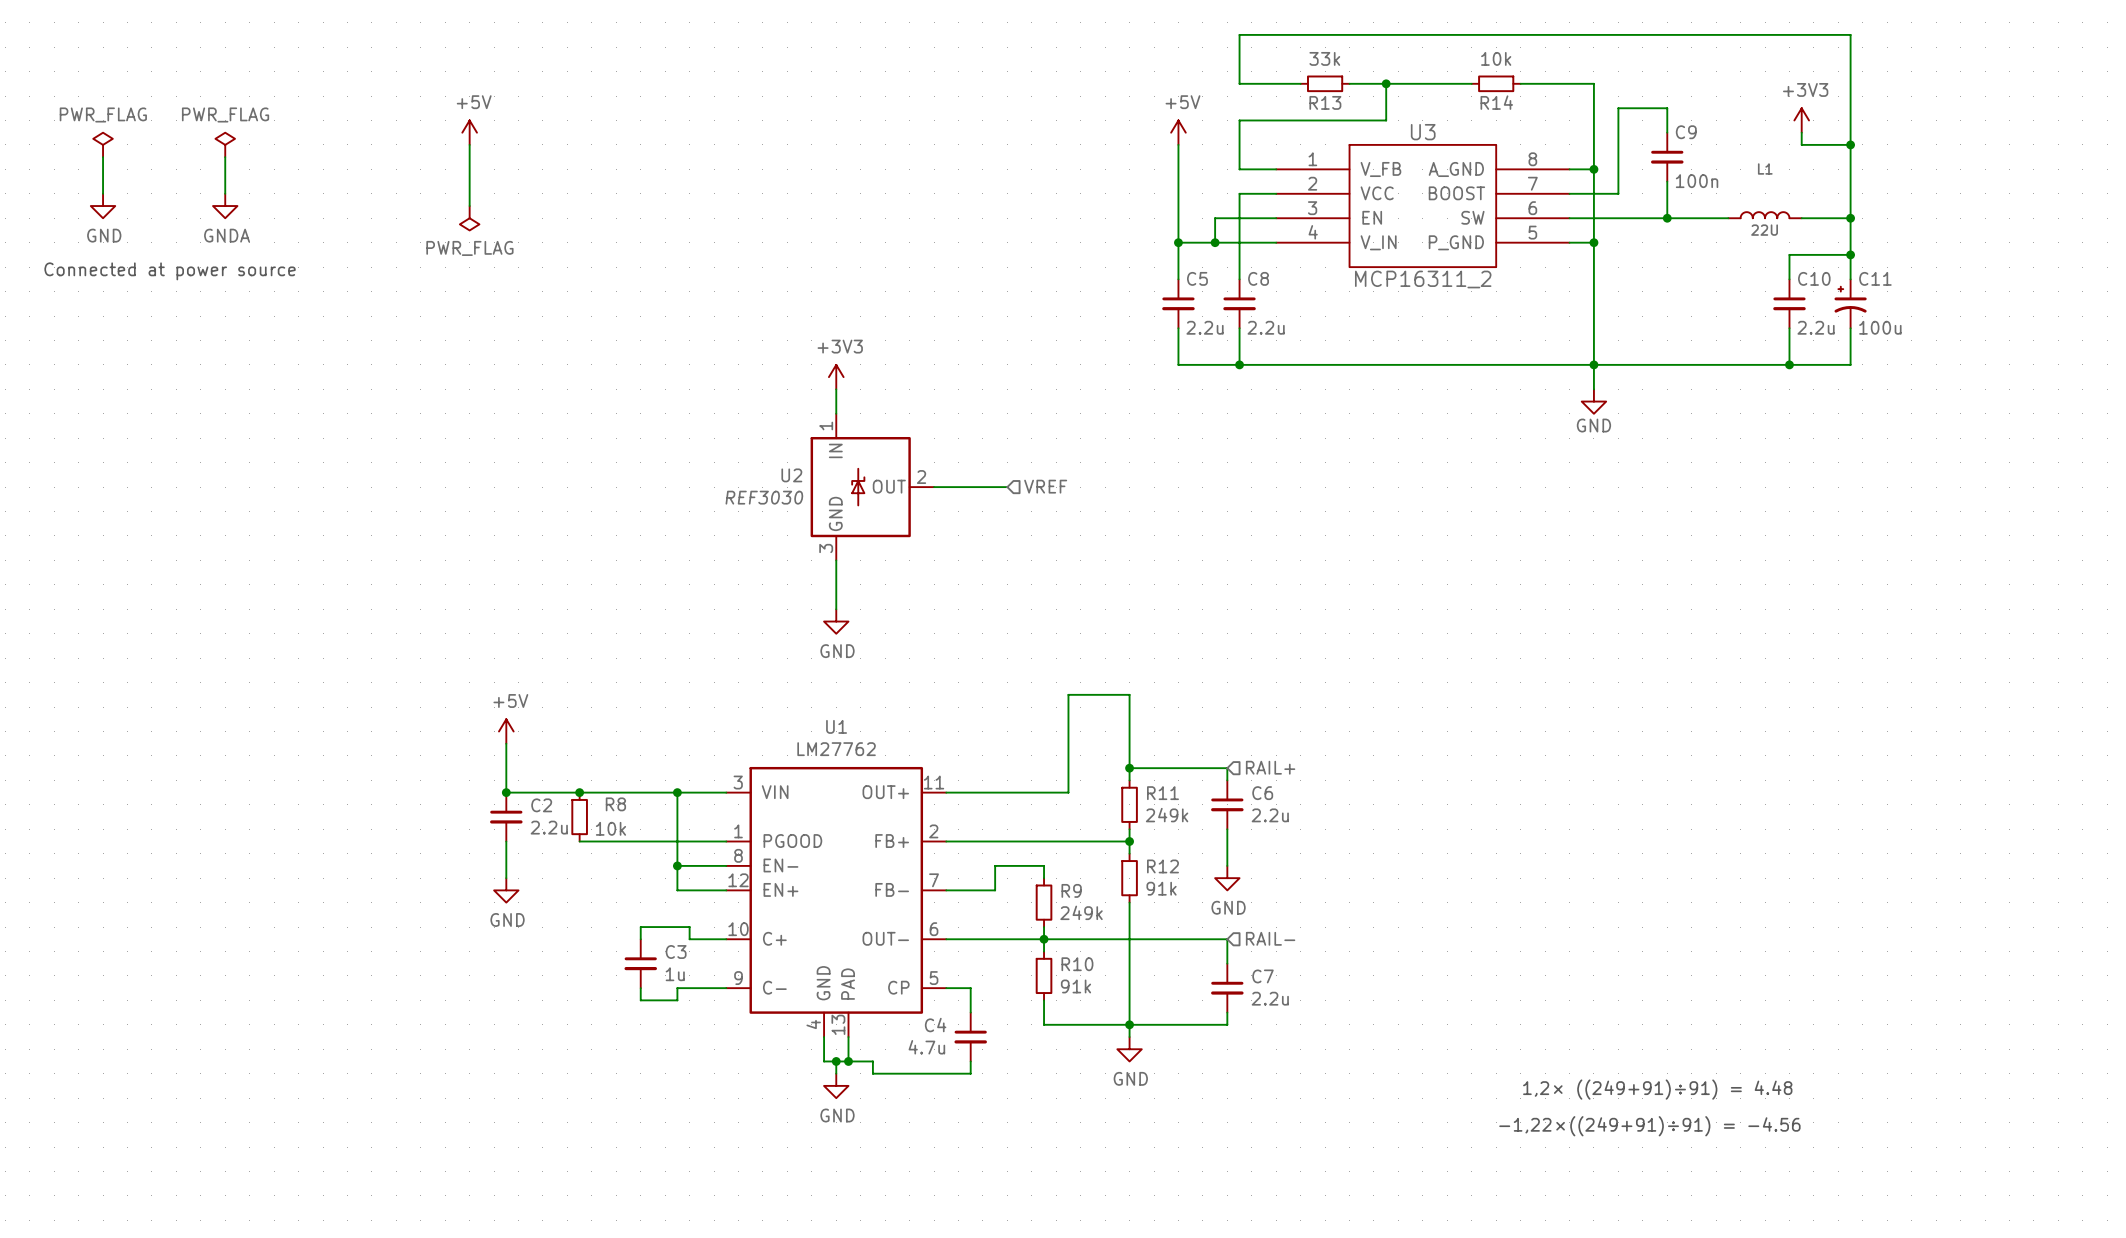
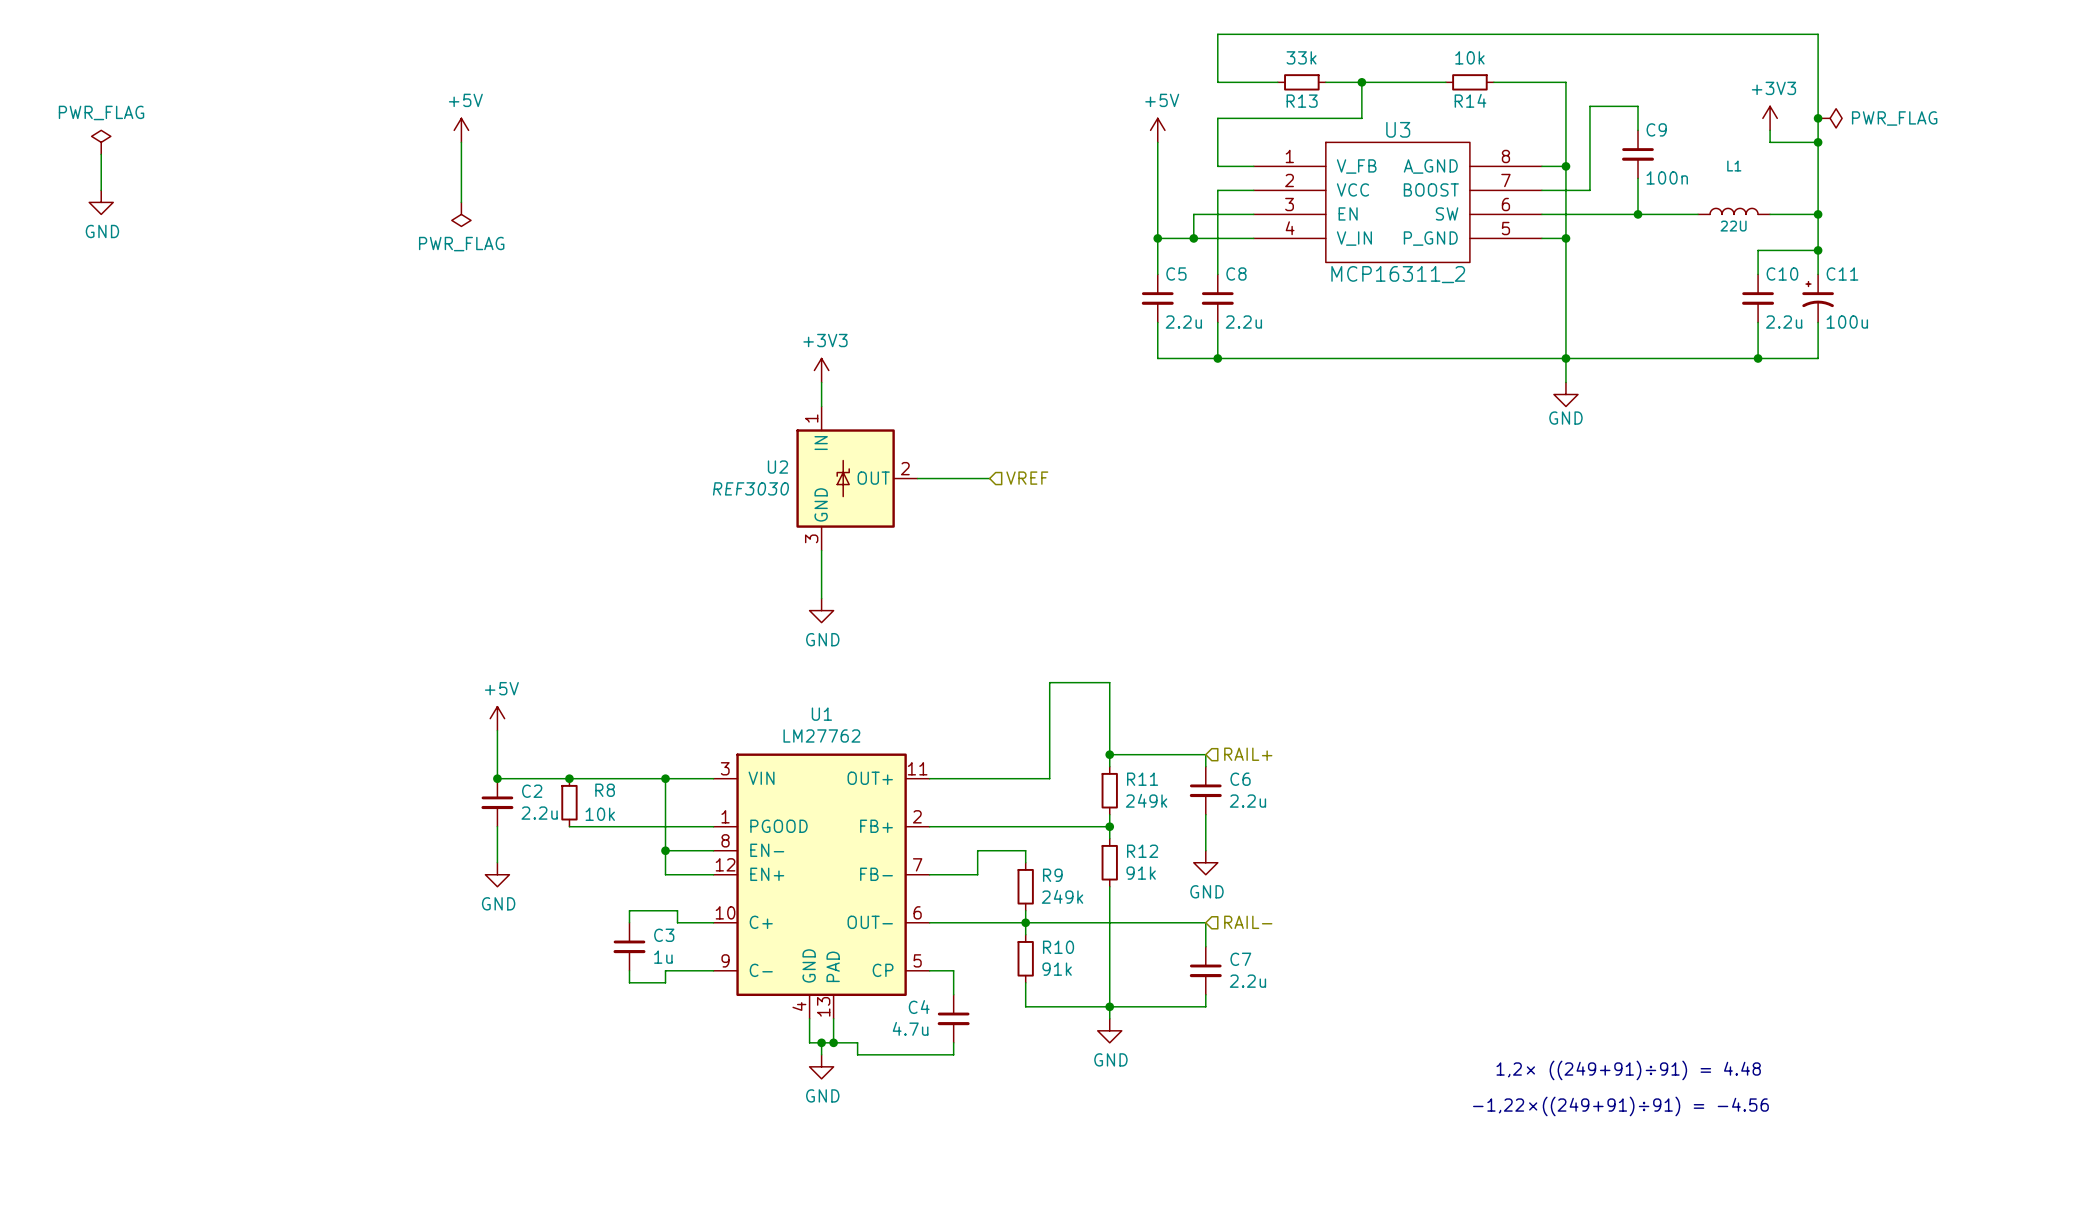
junction: none -> (1818, 118)
power symbol: none -> PWR_FLAG (1830, 118)
power symbol: PWR_FLAG (225, 144) -> none
wire: (225, 157) (225, 193) -> none
power symbol: GNDA (225, 206) -> none
text: Connected at power source (170, 271) -> none

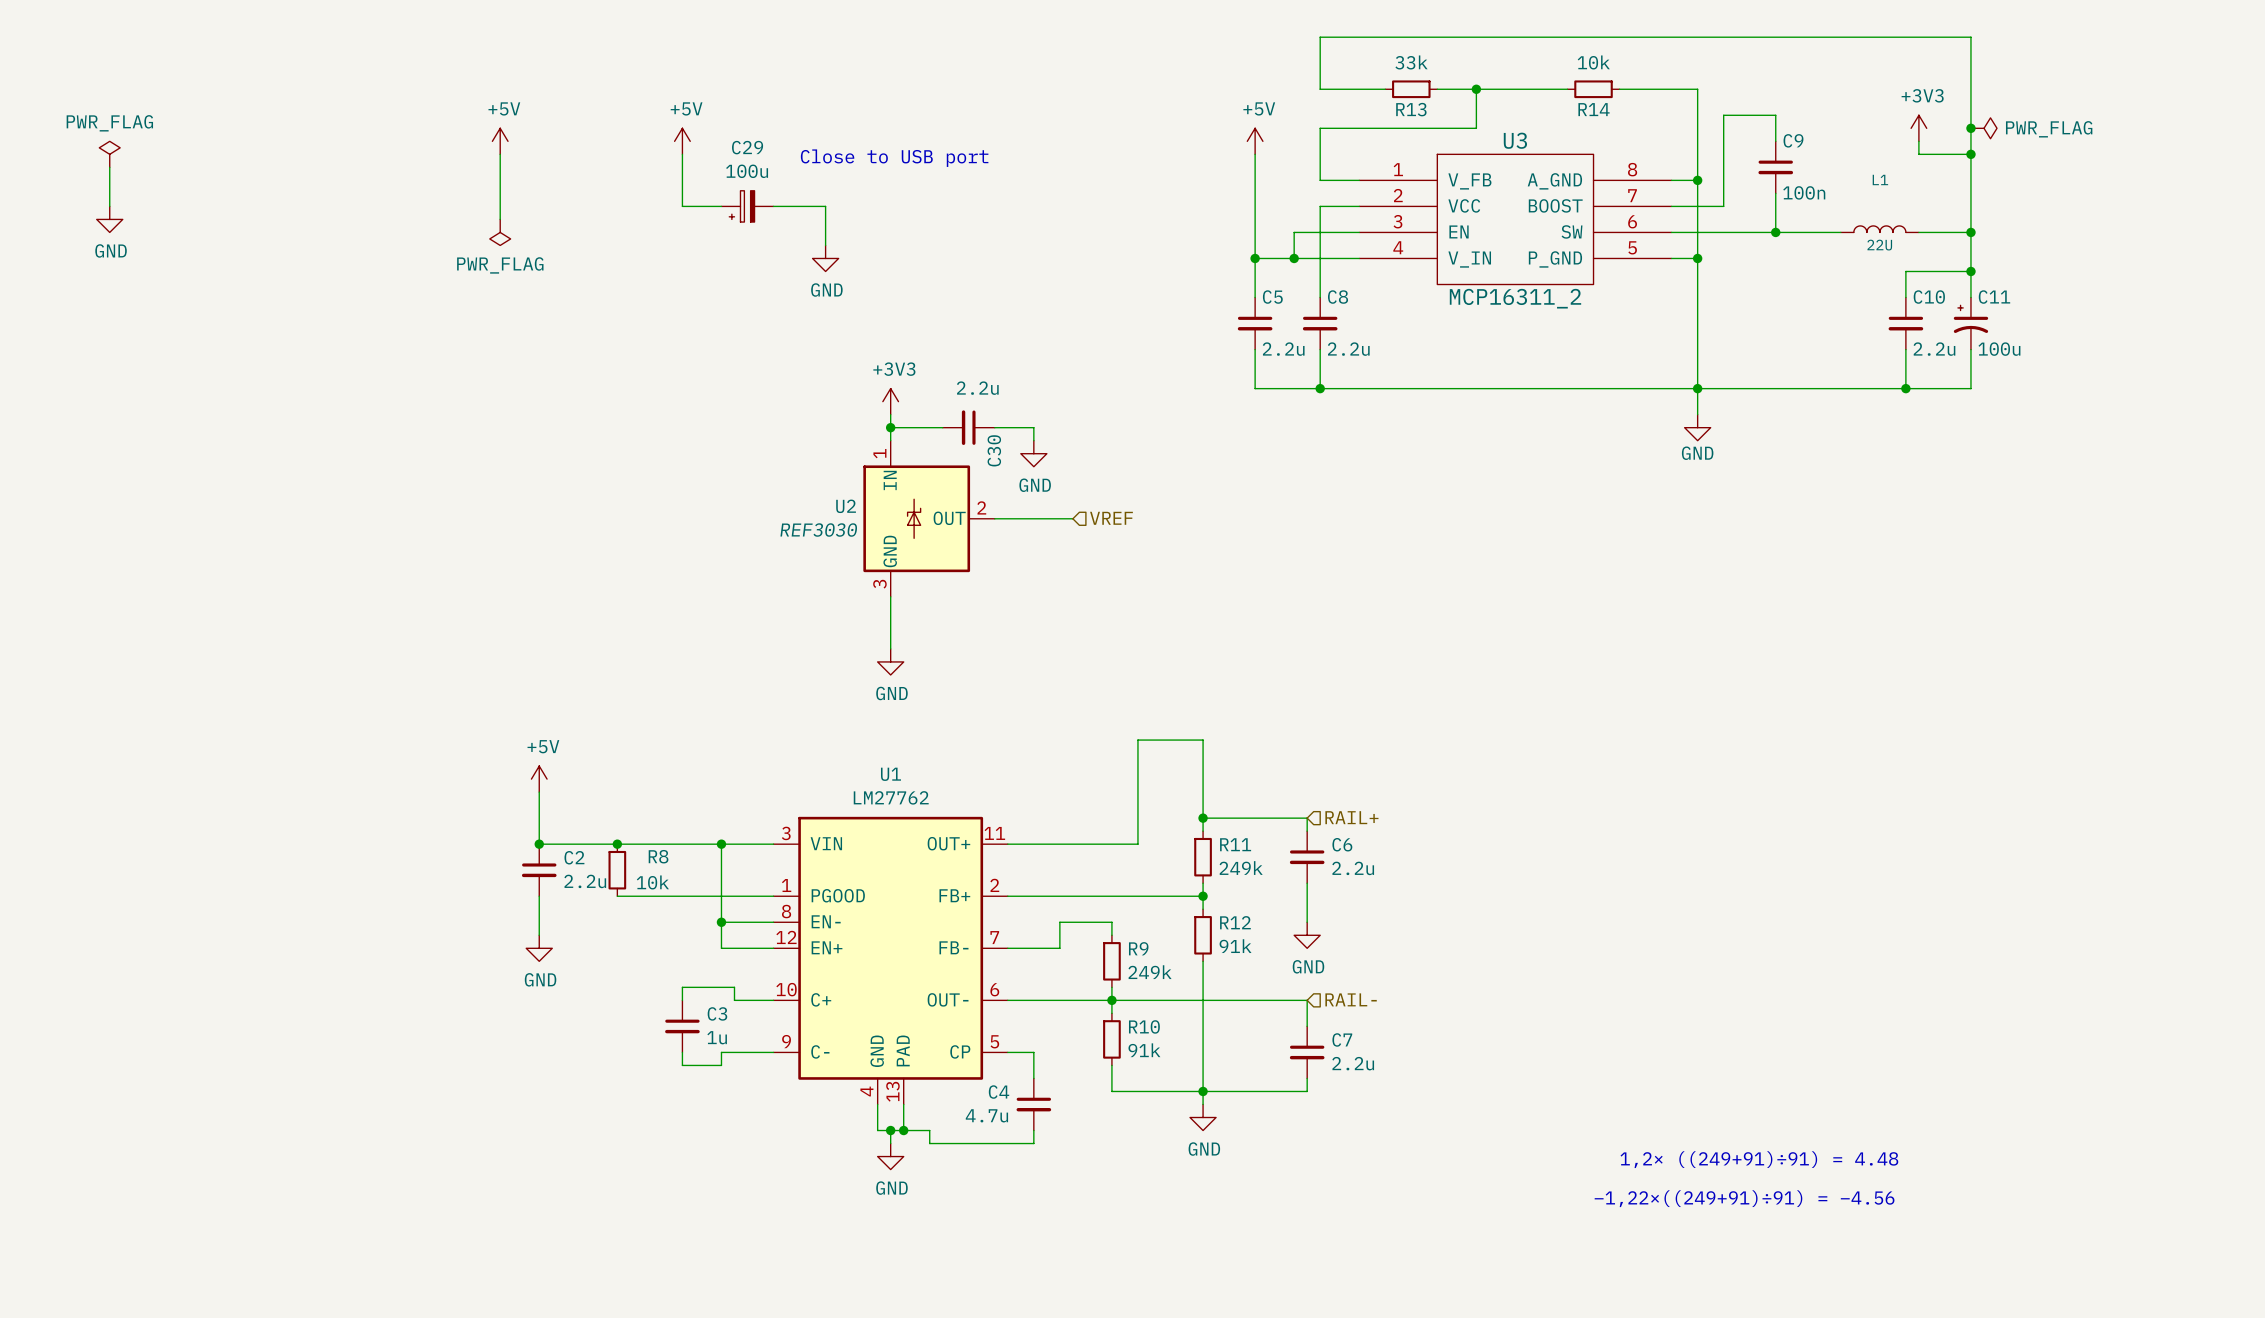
power symbol: none -> +5V (682, 141)
wire: none -> (682, 154) (682, 206) (721, 206)
text: none -> Close to USB port (894, 158)
C29: none -> 100u (747, 206)
wire: none -> (773, 206) (825, 206) (825, 245)
power symbol: none -> GND (825, 258)
wire: none -> (890, 427) (942, 427)
junction: none -> (890, 427)
C30: none -> 2.2u (968, 427)
wire: none -> (994, 427) (1033, 427) (1033, 440)
power symbol: none -> GND (1033, 453)

